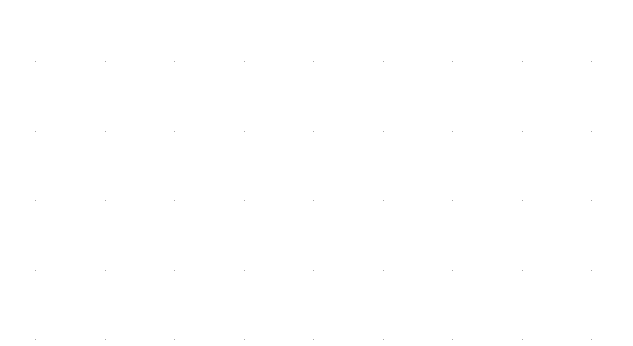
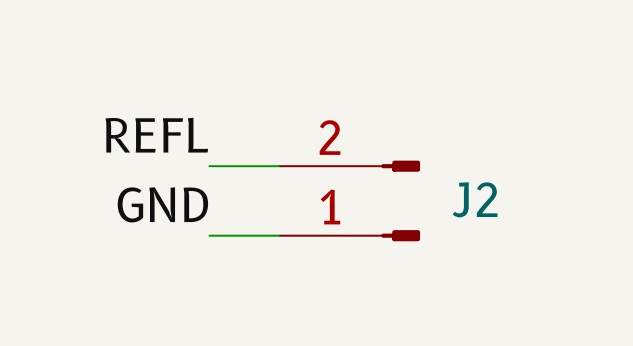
label: none -> REFL (156, 135)
wire: none -> (209, 166) (278, 166)
J2: none -> (349, 200)
label: none -> GND (162, 204)
wire: none -> (209, 235) (278, 235)

